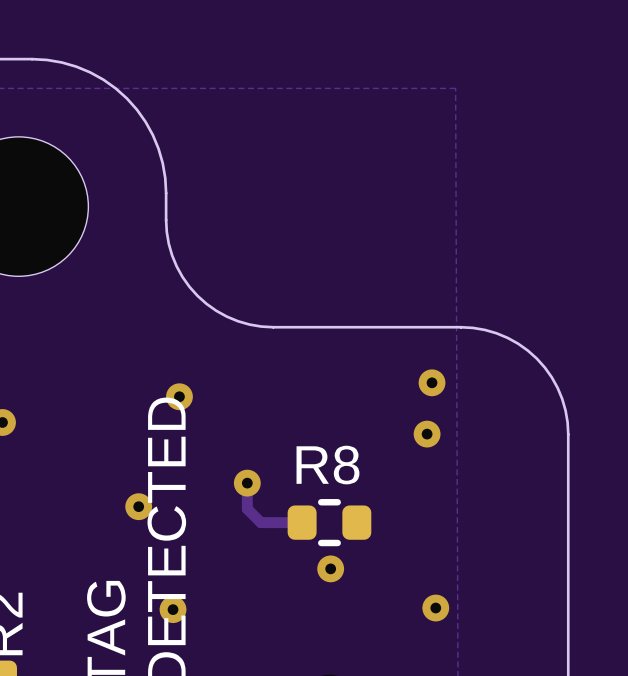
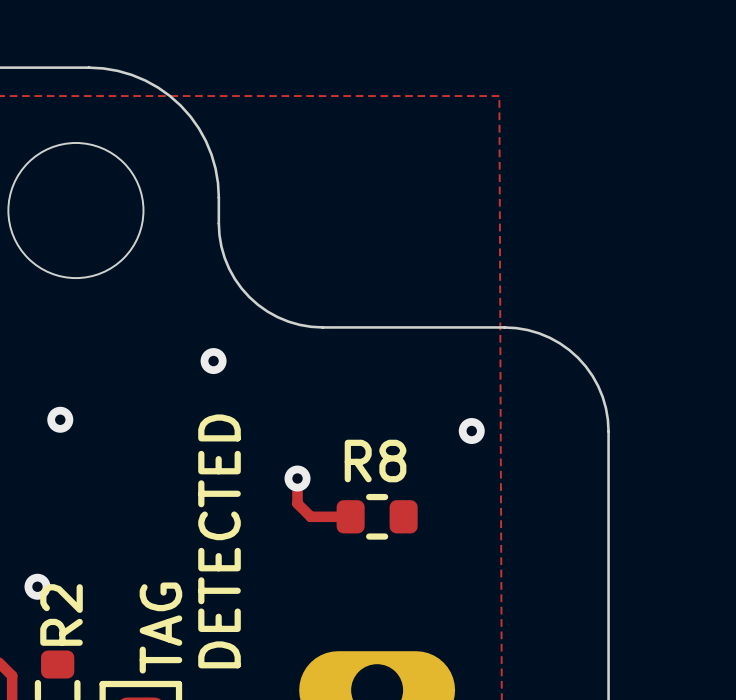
via: (432, 382) -> none
via position: (179, 396) -> (213, 361)
via: (138, 506) -> none
via: (330, 568) -> none
via: (435, 608) -> none
via: (173, 609) -> none

